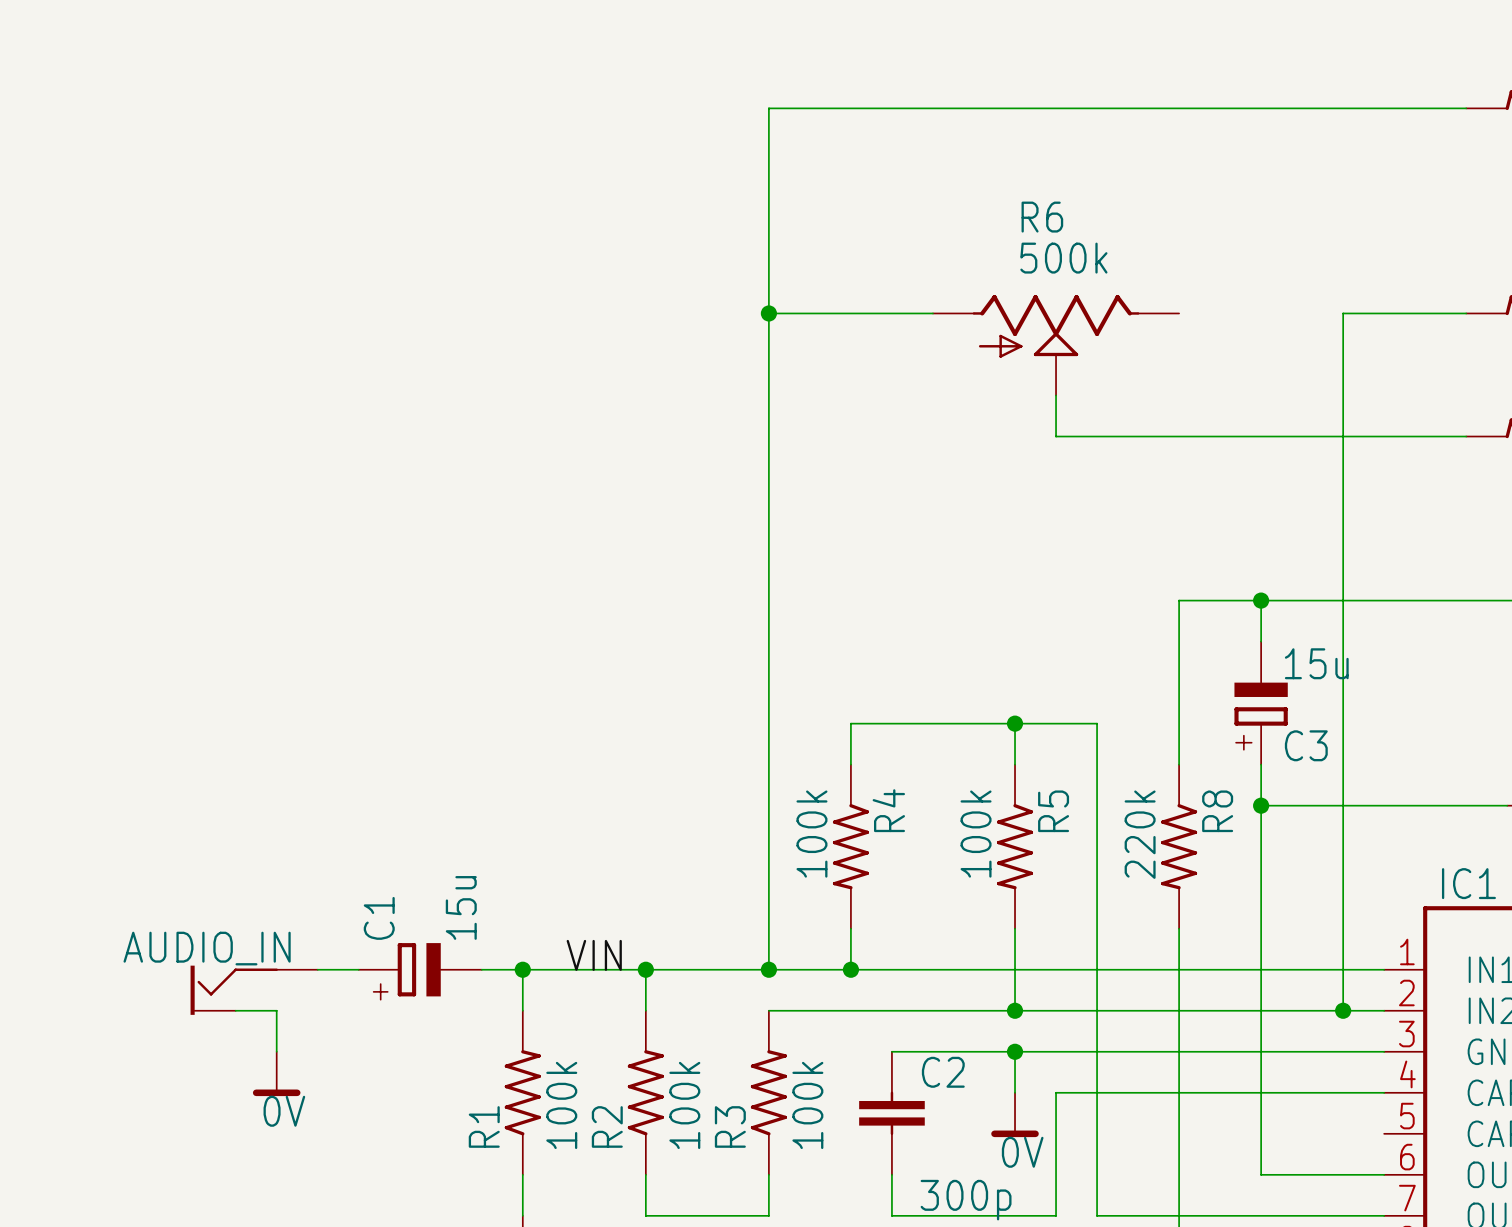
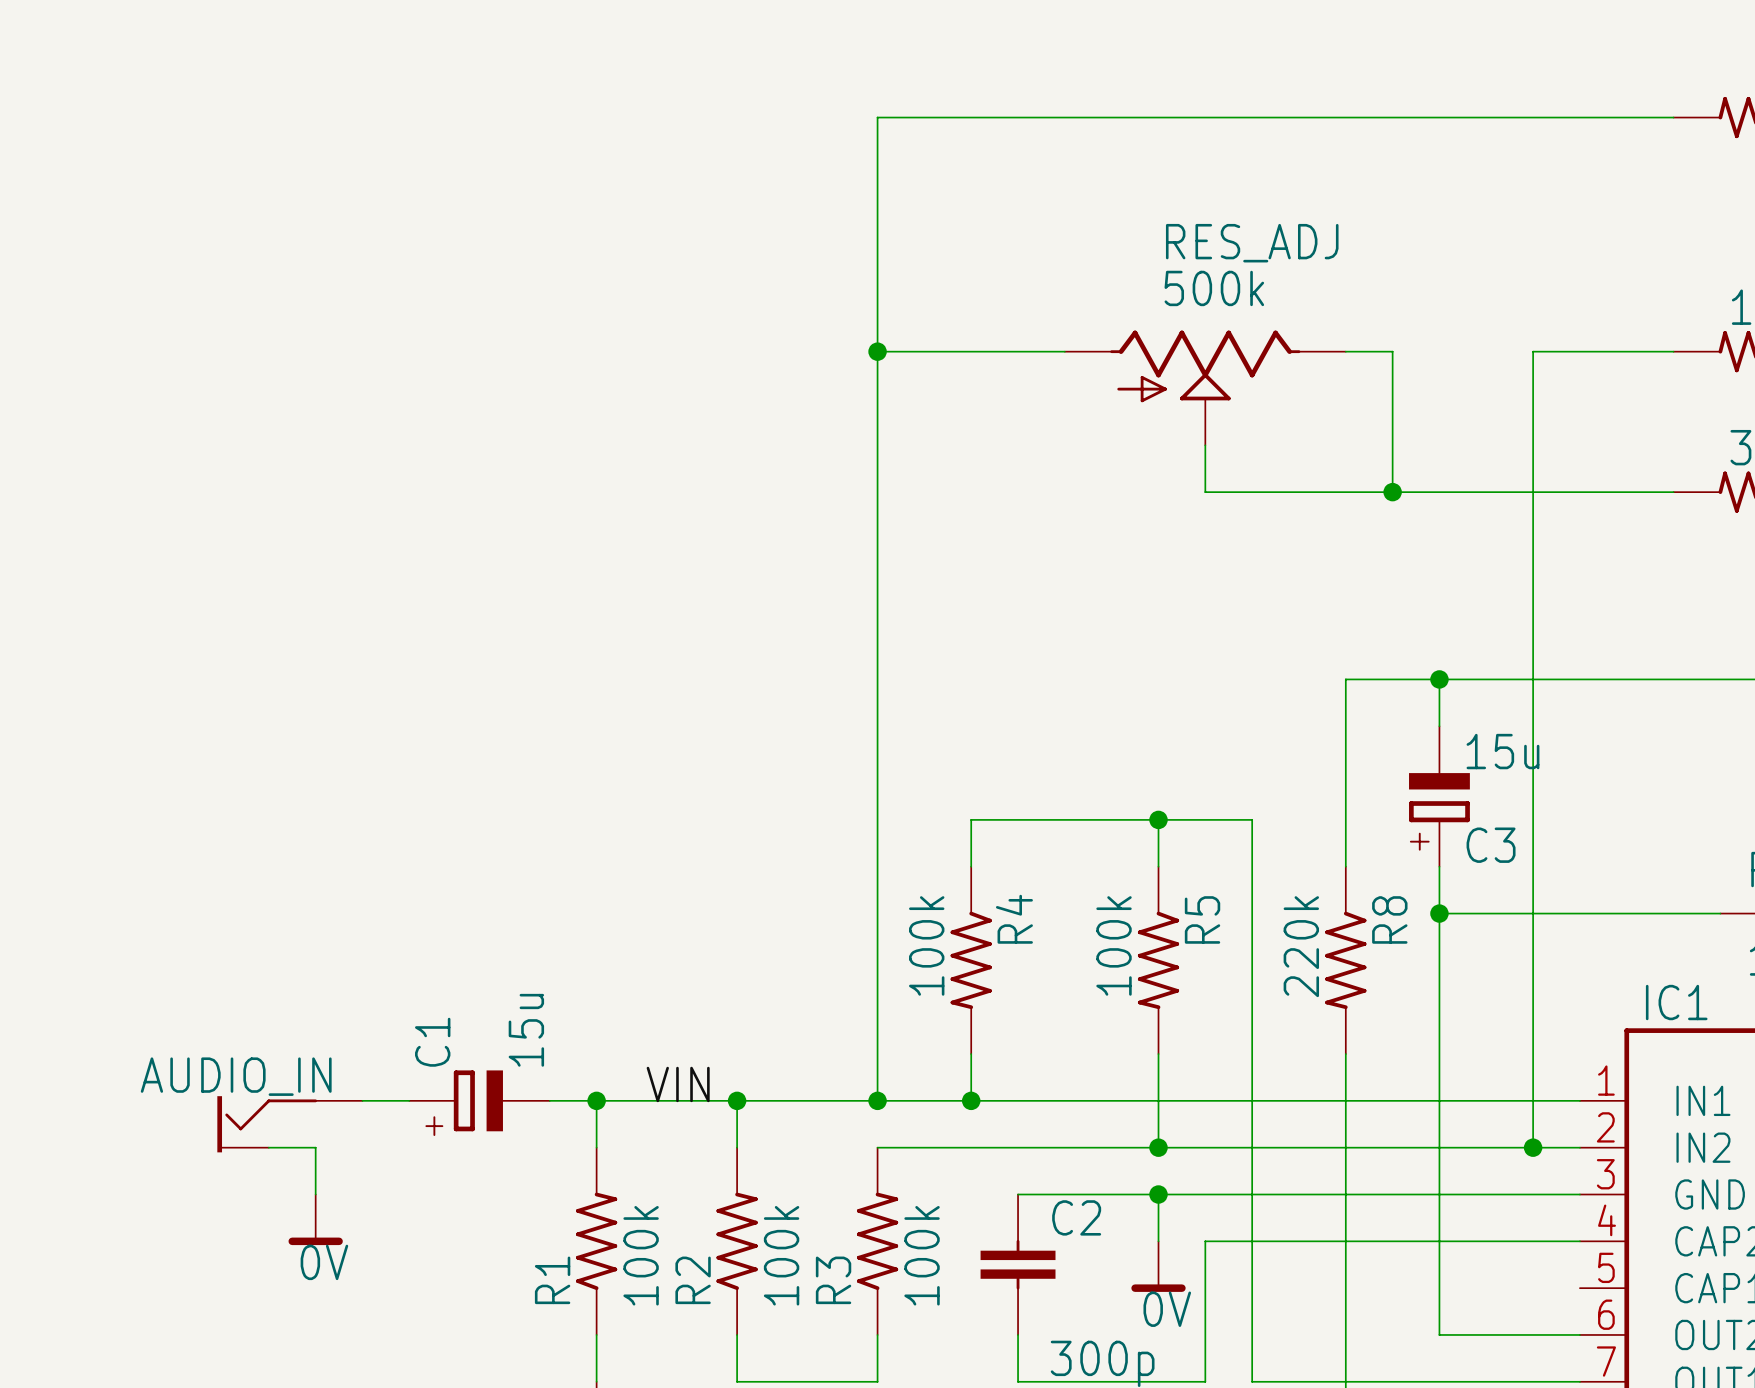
R6 name: R6 (1042, 217) -> RES_ADJ (1252, 243)
wire: none -> (1345, 351) (1392, 351) (1392, 492)
junction: none -> (1392, 492)

